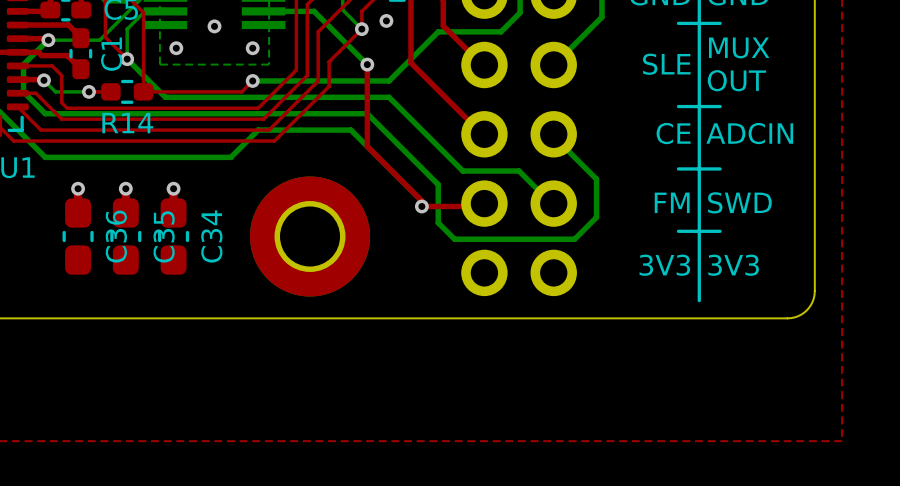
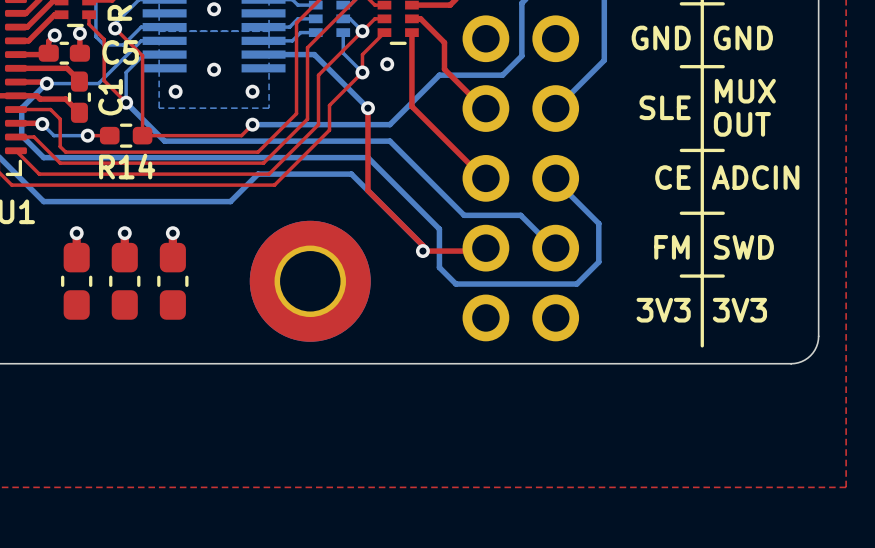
C36 name: C36 (116, 236) -> none
C35 name: C35 (164, 236) -> none
C34 name: C34 (211, 236) -> none

